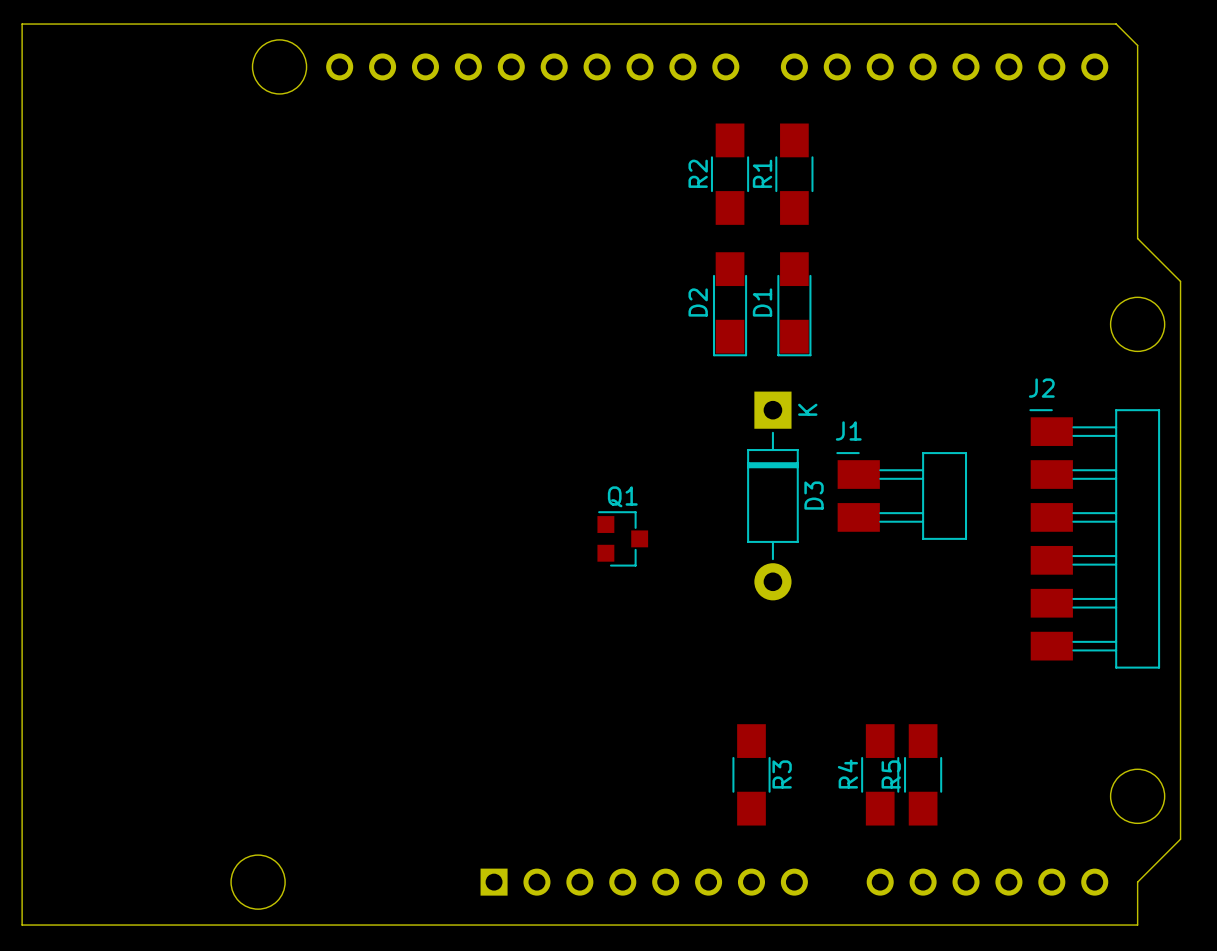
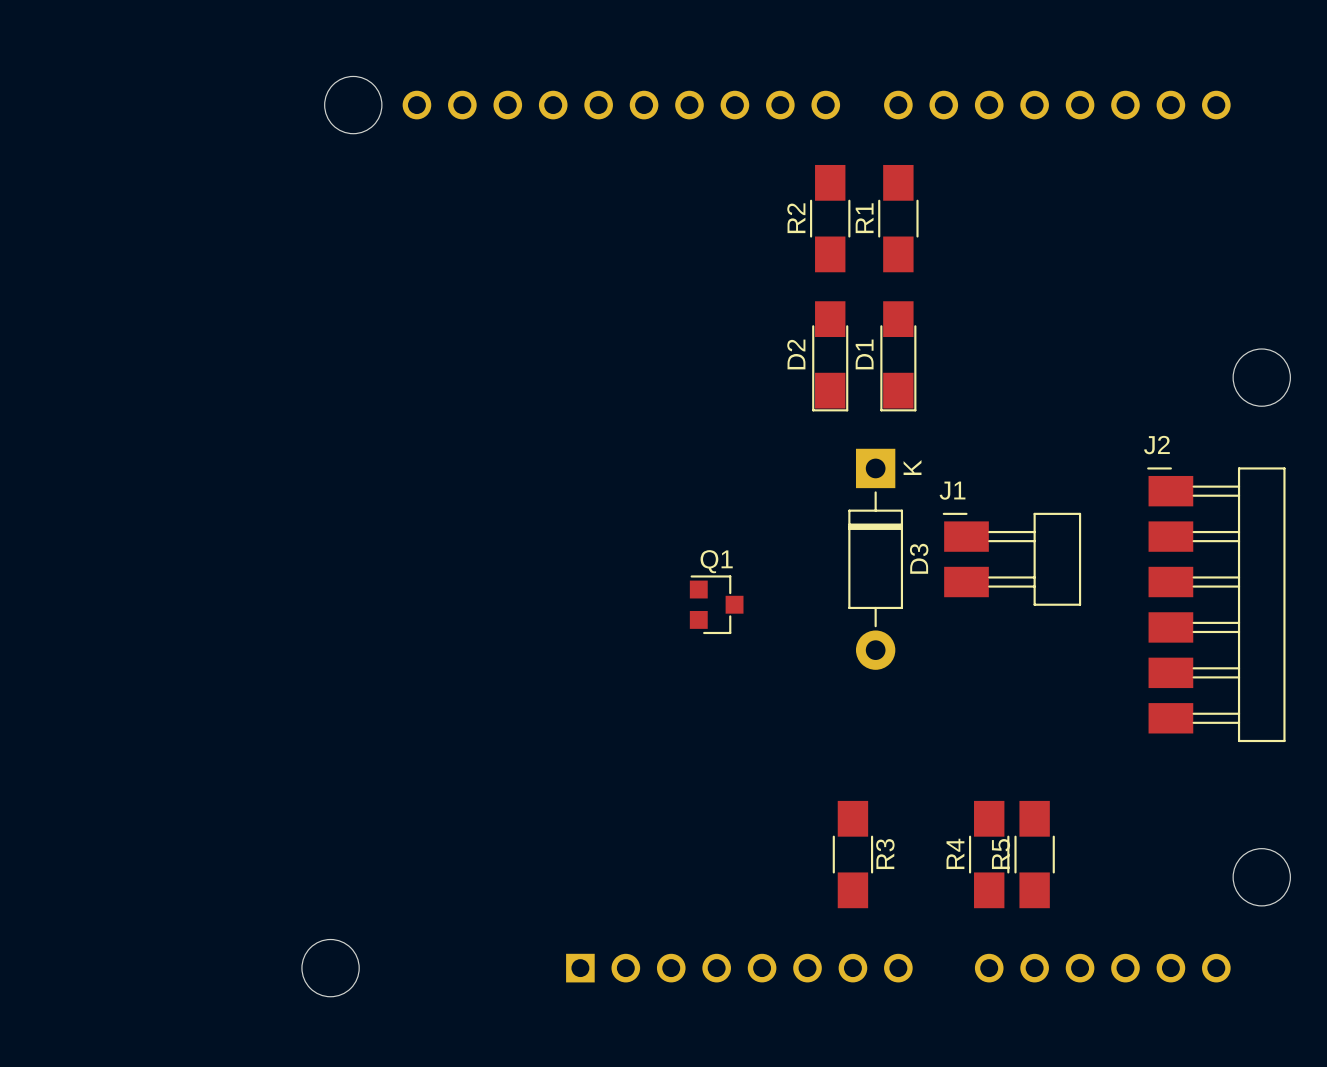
board edge: (22, 24) (1116, 24) (1137, 45) (1137, 238) (1180, 281) (1180, 839) (1137, 882) (1137, 925) (22, 925) (22, 24) -> none

